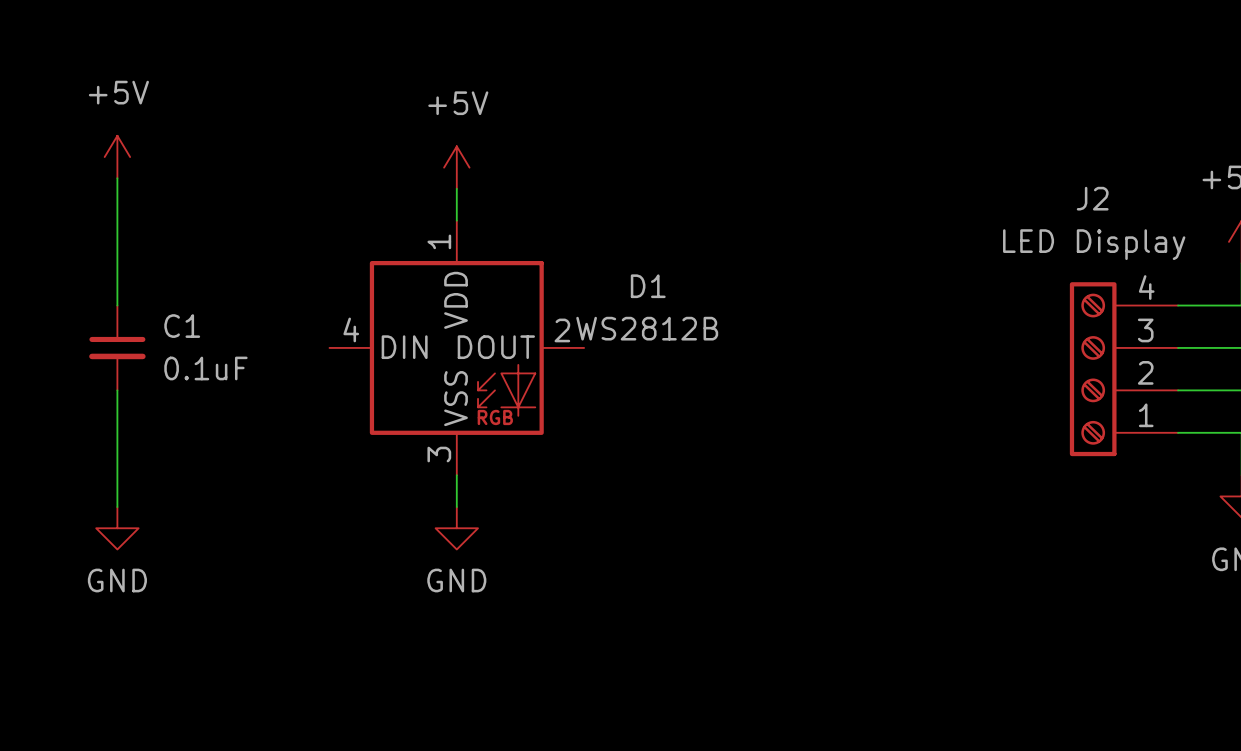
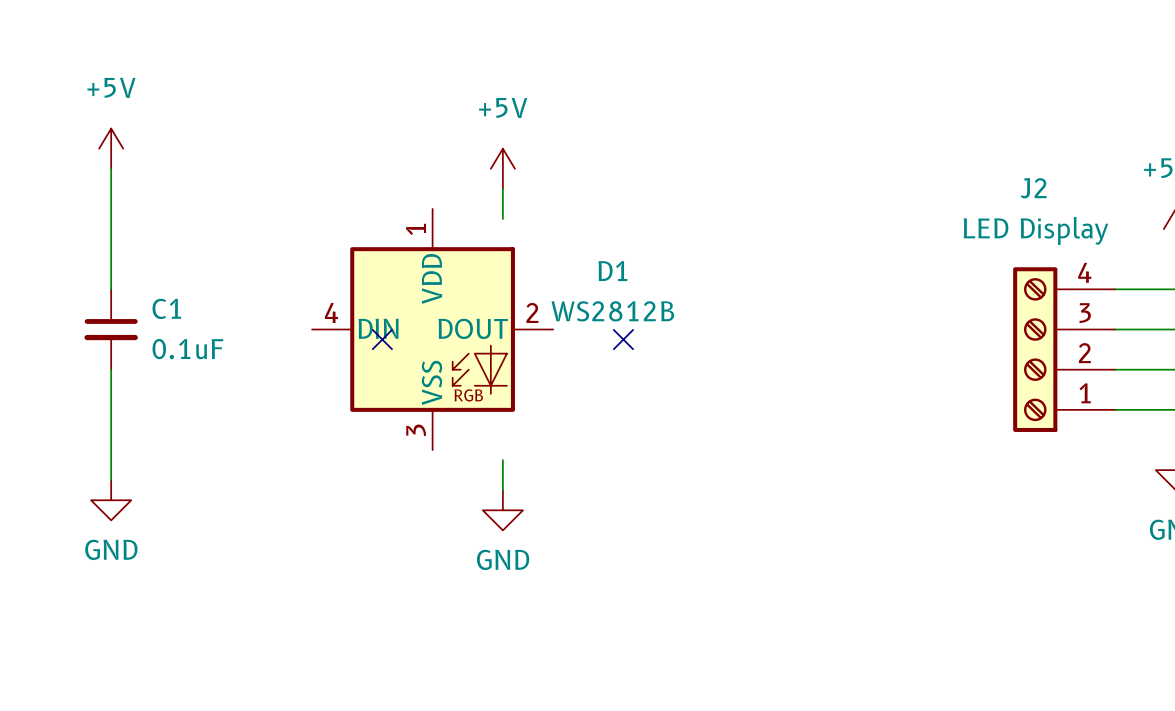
power symbol position: +5V (456, 167) -> +5V (502, 168)
wire: (456, 188) (456, 220) -> (502, 188) (502, 219)
no-connect mark: none -> (382, 339)
no-connect mark: none -> (623, 339)
wire: (456, 475) (456, 507) -> (502, 460) (502, 490)
power symbol position: GND (456, 528) -> GND (502, 510)

